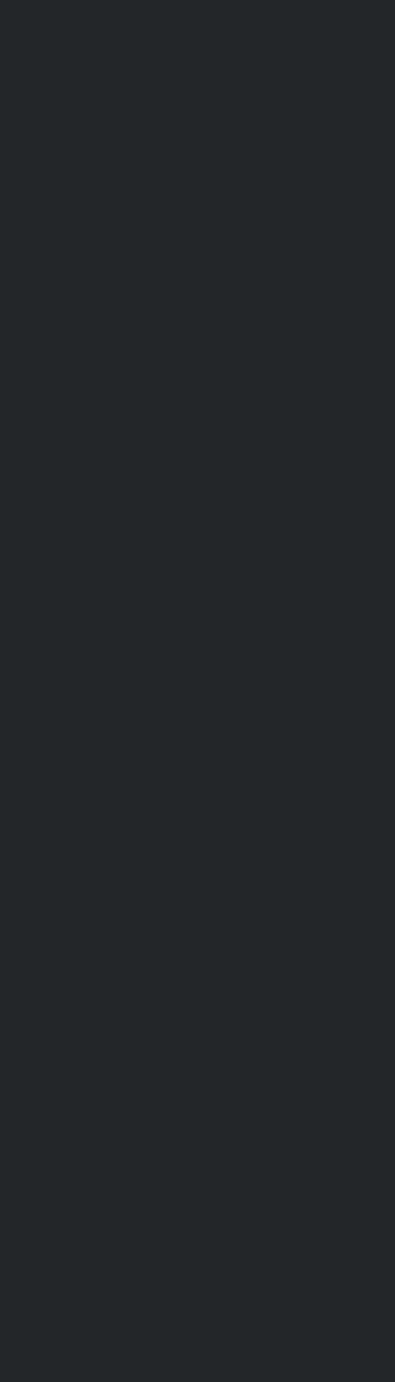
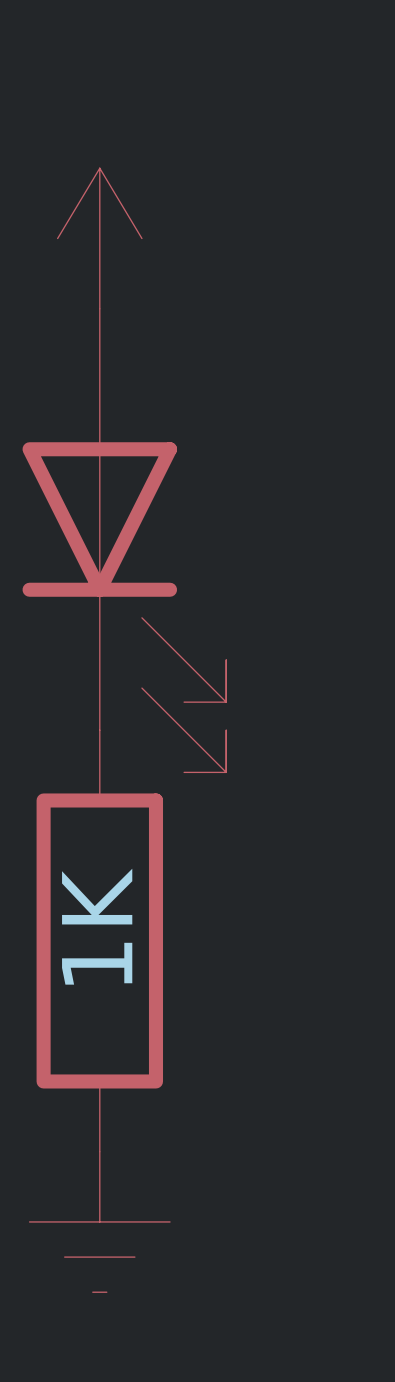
power symbol: none -> (99, 238)
part: none -> (124, 540)
part: none -> 1K (99, 940)
power symbol: none -> (99, 1221)

